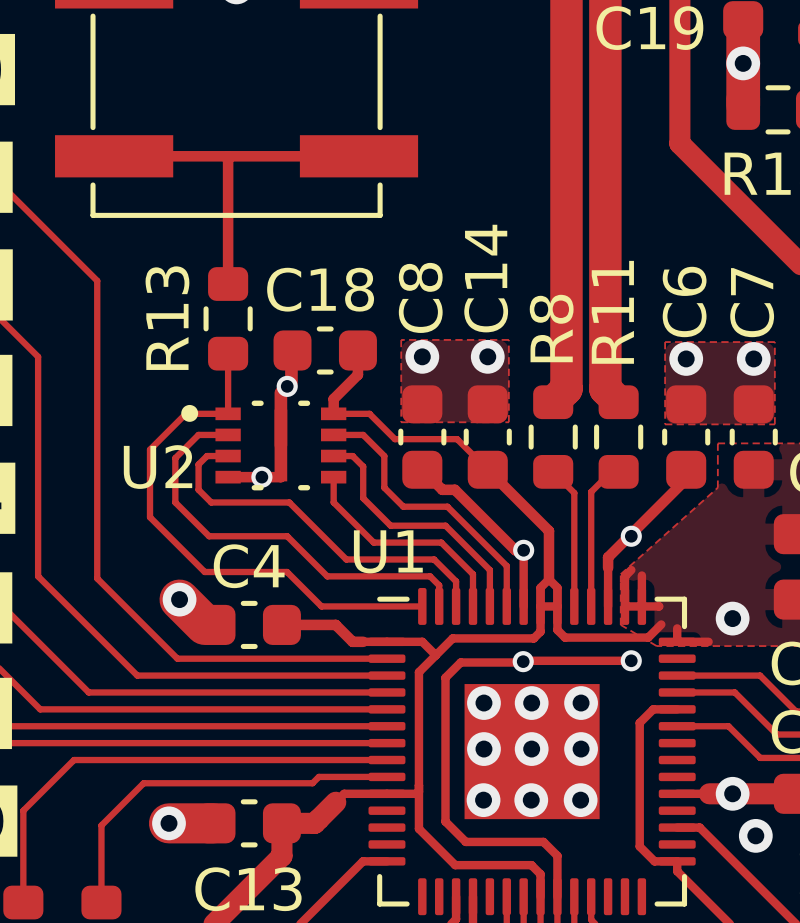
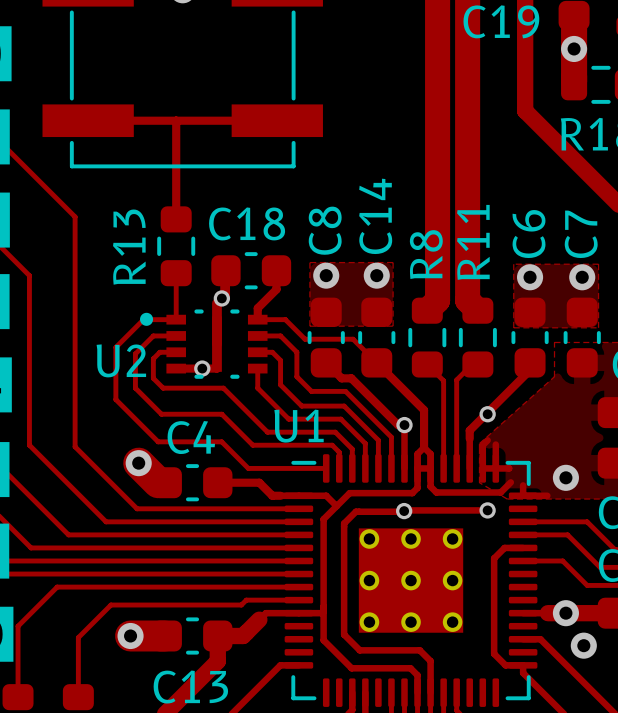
U1 footprint: [368, 587, 696, 916] -> [284, 454, 538, 707]
via: (483, 703) -> none
via: (531, 703) -> none
via: (581, 703) -> none
via: (483, 749) -> none
via: (531, 749) -> none
via: (581, 749) -> none
via: (483, 800) -> none
via: (531, 800) -> none
via: (580, 800) -> none

